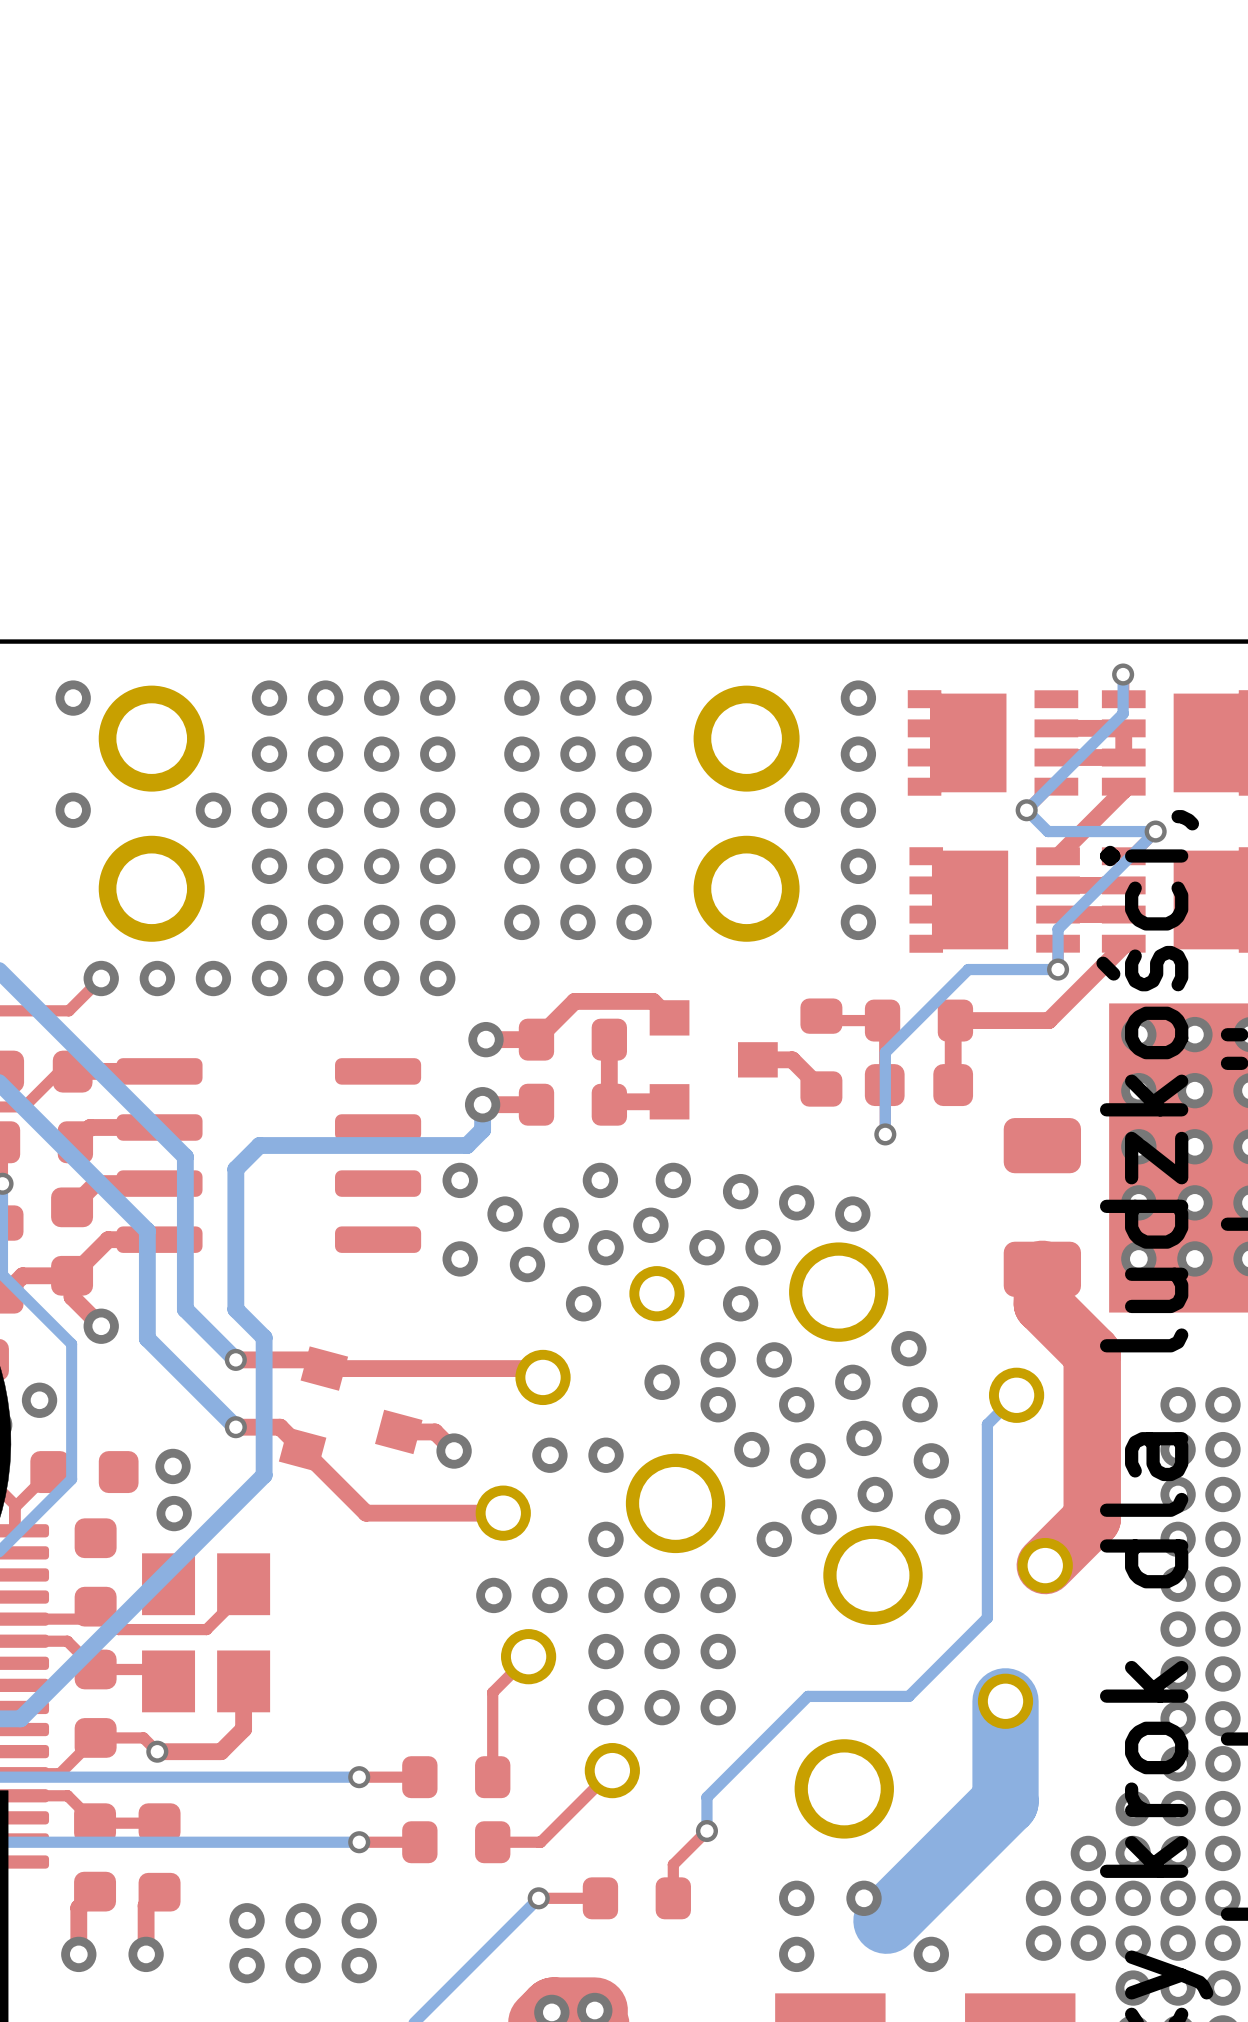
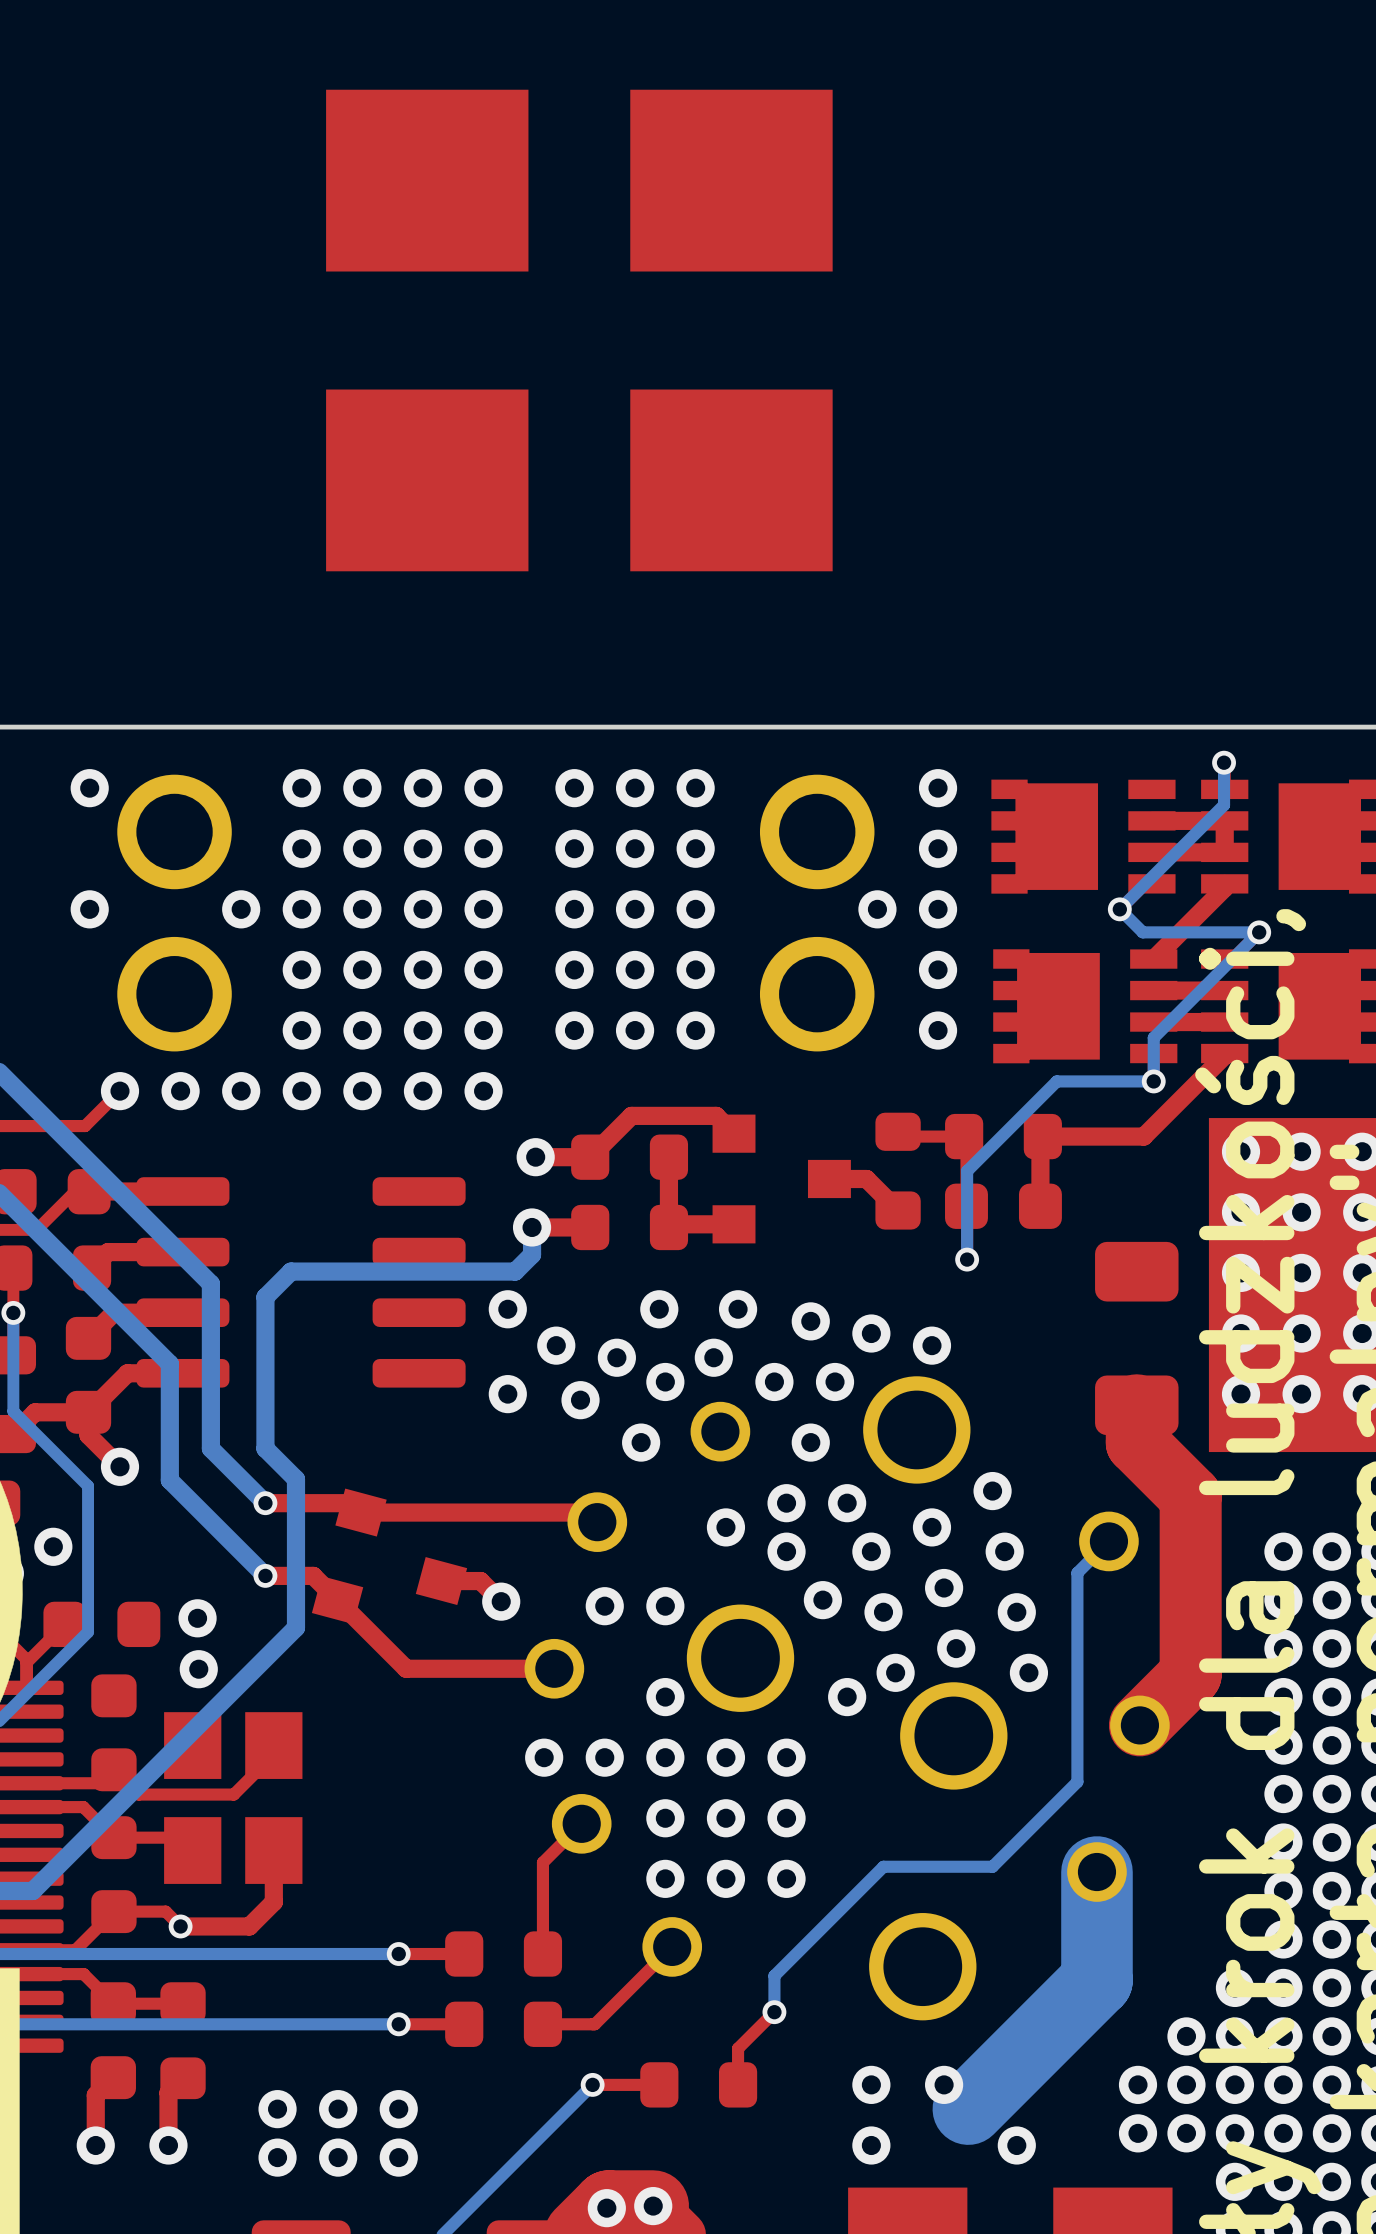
part: none -> (579, 180)
part: none -> (579, 480)

